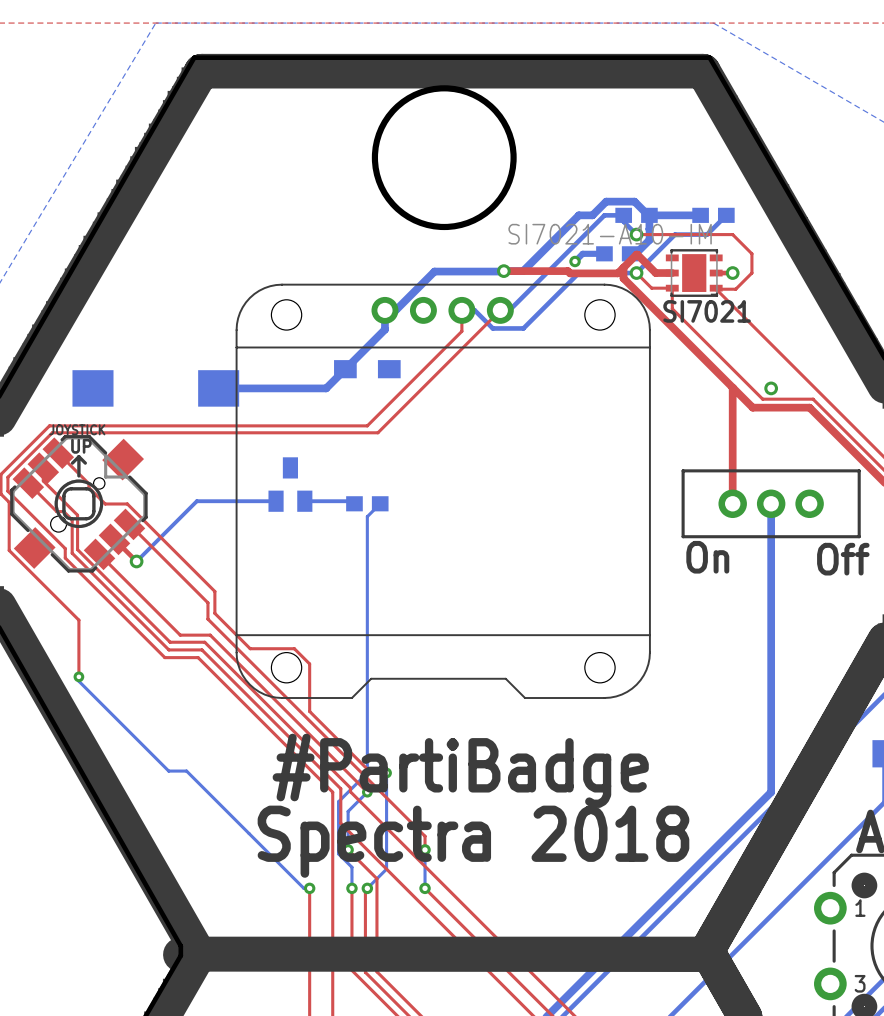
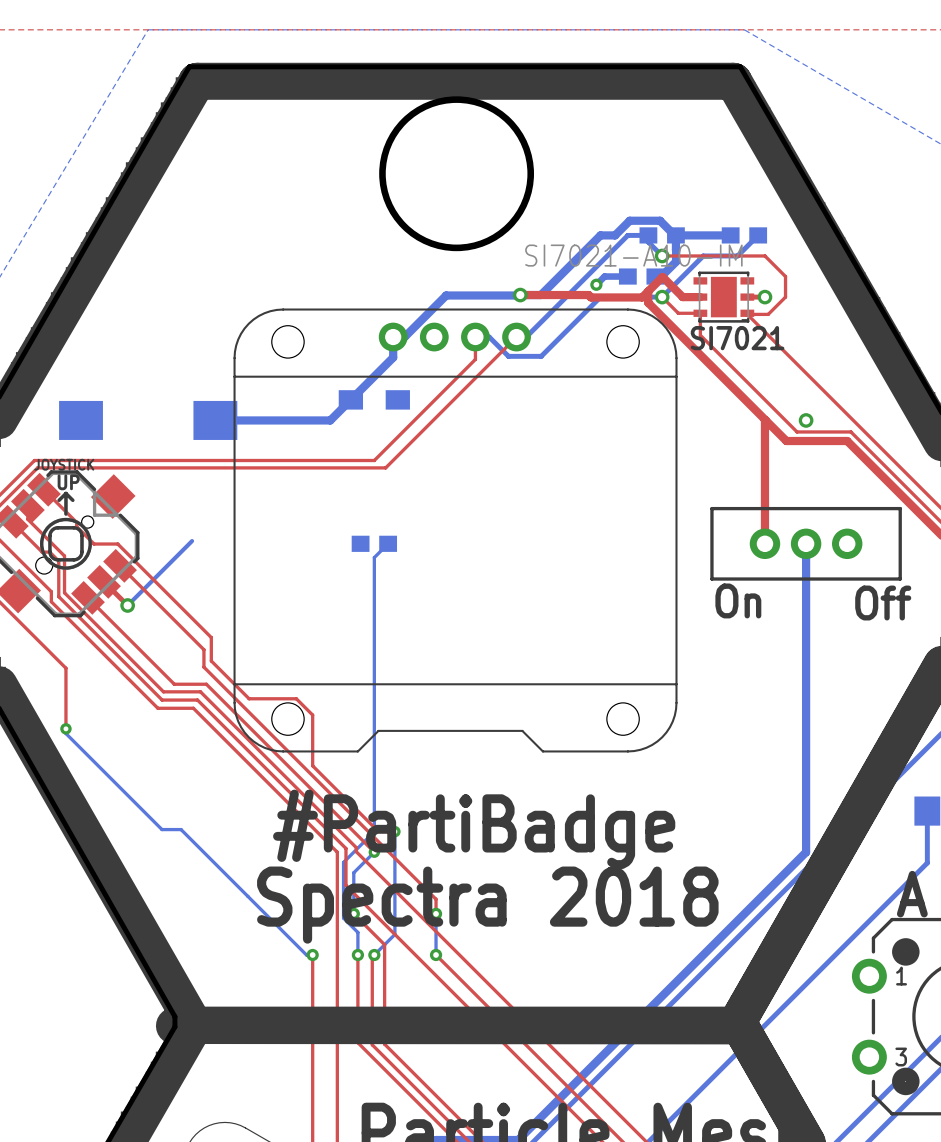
part: (290, 484) -> none
bottom track: (196, 501) (276, 501) -> none
bottom track: (304, 501) (351, 501) -> none

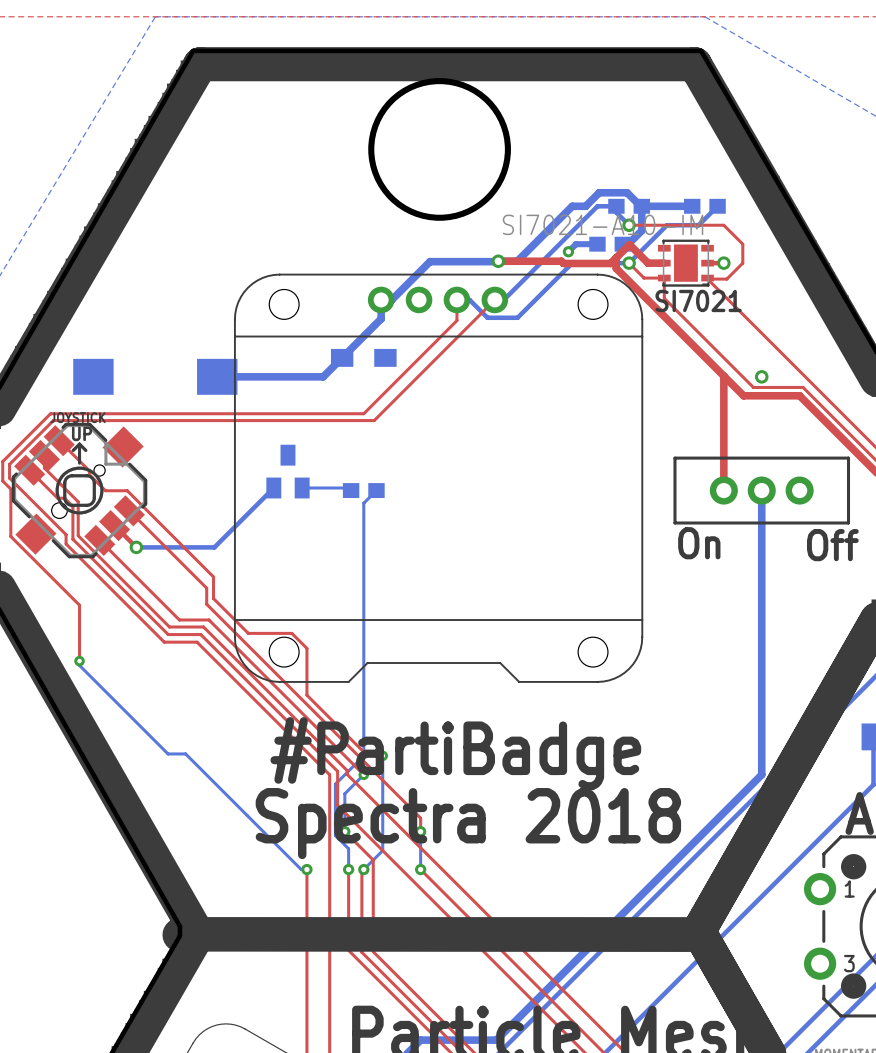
part: none -> (287, 471)
bottom track: (192, 541) (127, 605) -> (273, 488) (214, 547) (136, 547)
bottom track: none -> (302, 488) (348, 488) (351, 490)

